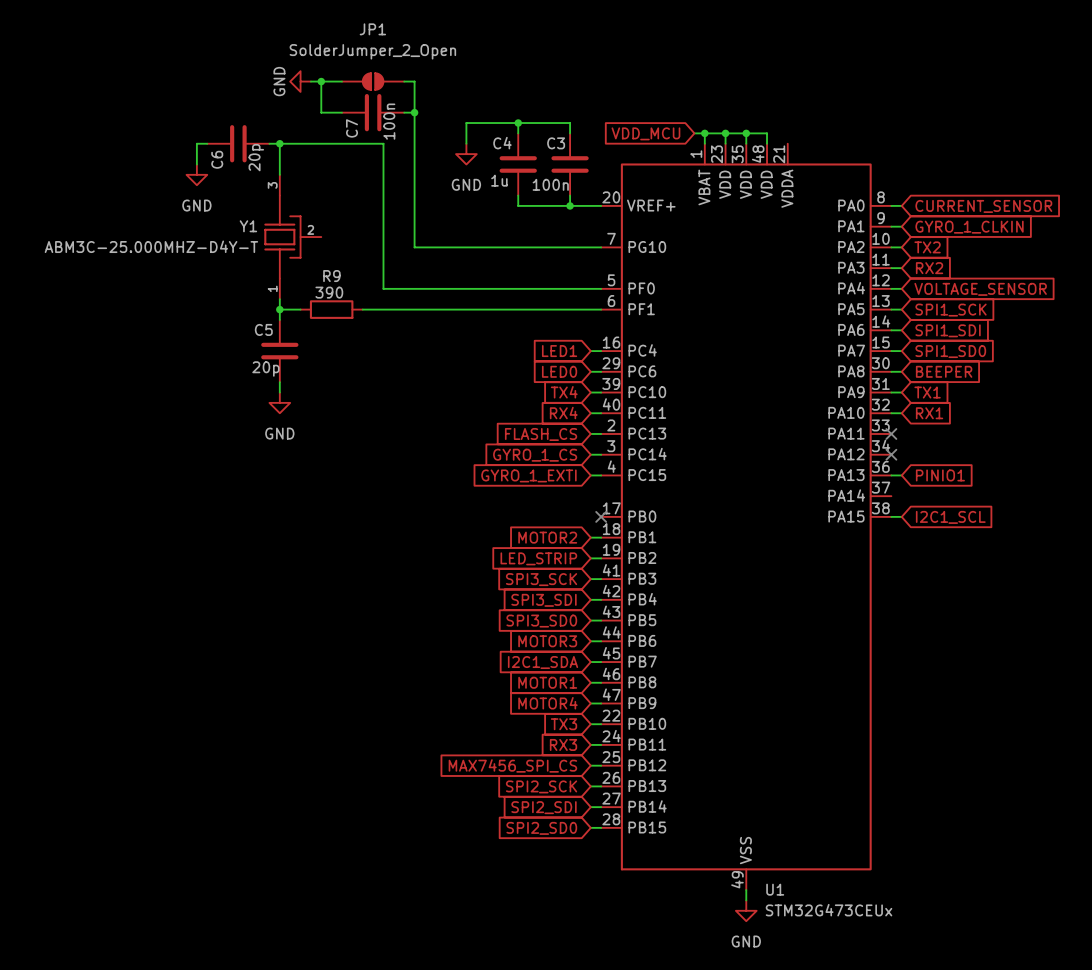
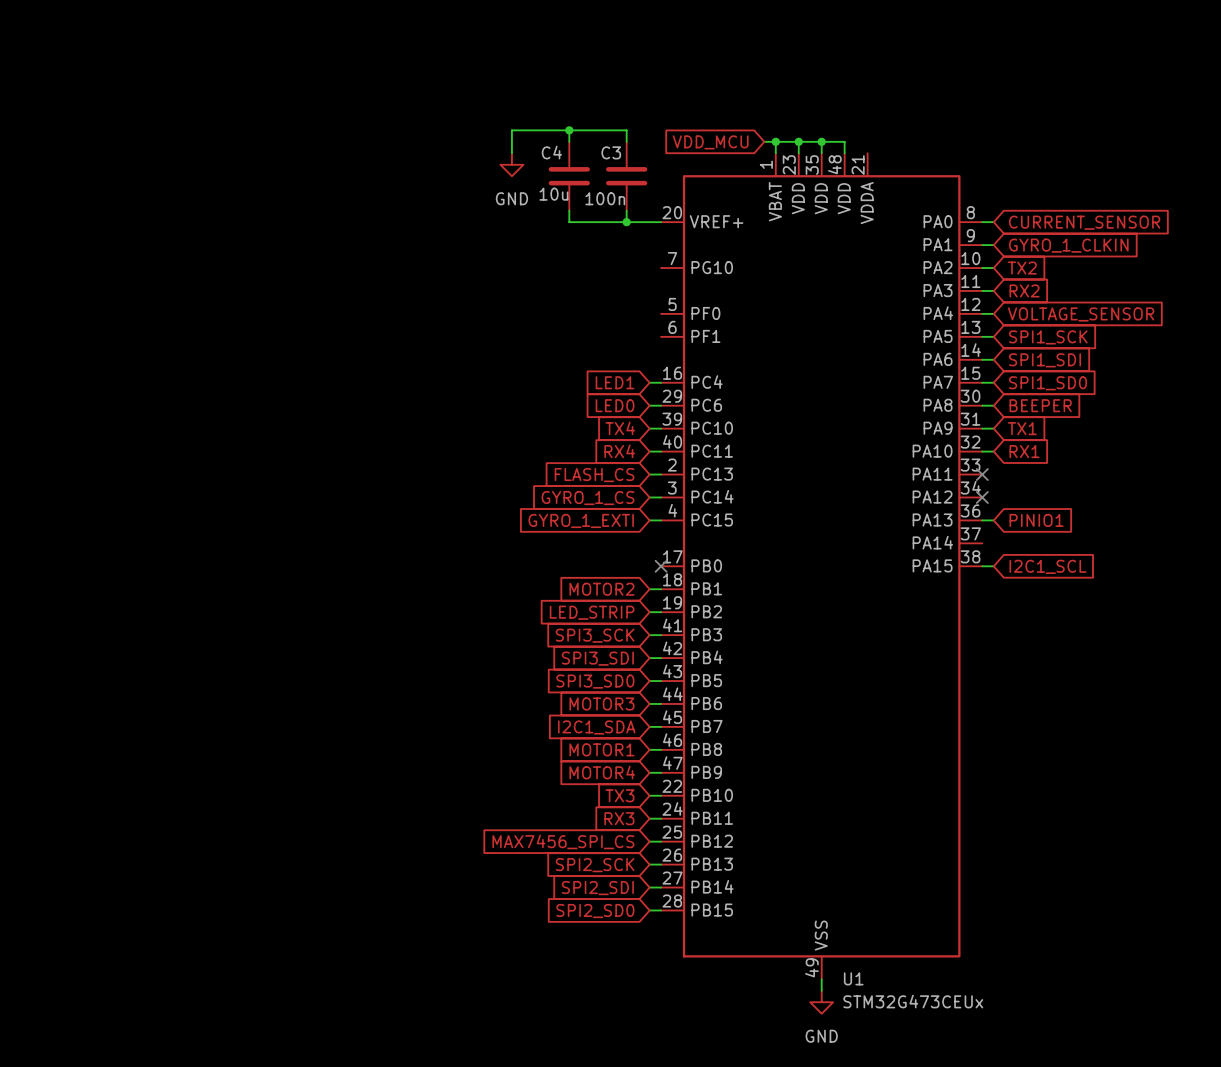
power symbol: GND (300, 81) -> none
wire: (310, 81) (342, 81) -> none
wire: (321, 81) (321, 112) (342, 112) -> none
junction: (321, 81) -> none
JP1: SolderJumper_2_Open (373, 81) -> none
wire: (404, 81) (414, 81) (414, 247) (601, 247) -> none
C7: 100n (373, 112) -> none
wire: (404, 112) (414, 112) -> none
junction: (414, 112) -> none
wire: (207, 143) (196, 143) (196, 164) -> none
C6: 20p (238, 143) -> none
wire: (269, 143) (383, 143) (383, 288) (601, 288) -> none
wire: (279, 143) (279, 174) -> none
junction: (279, 143) -> none
power symbol: GND (196, 174) -> none
C4 value: 1u (499, 180) -> 10u (553, 194)
Y1: ABM3C-25.000MHZ-D4Y-T (292, 237) -> none
wire: (279, 299) (279, 319) -> none
wire: (279, 309) (300, 309) -> none
junction: (279, 309) -> none
R9: 390 (331, 309) -> none
wire: (362, 309) (601, 309) -> none
C5: 20p (279, 351) -> none
wire: (279, 382) (279, 392) -> none
power symbol: GND (279, 402) -> none

